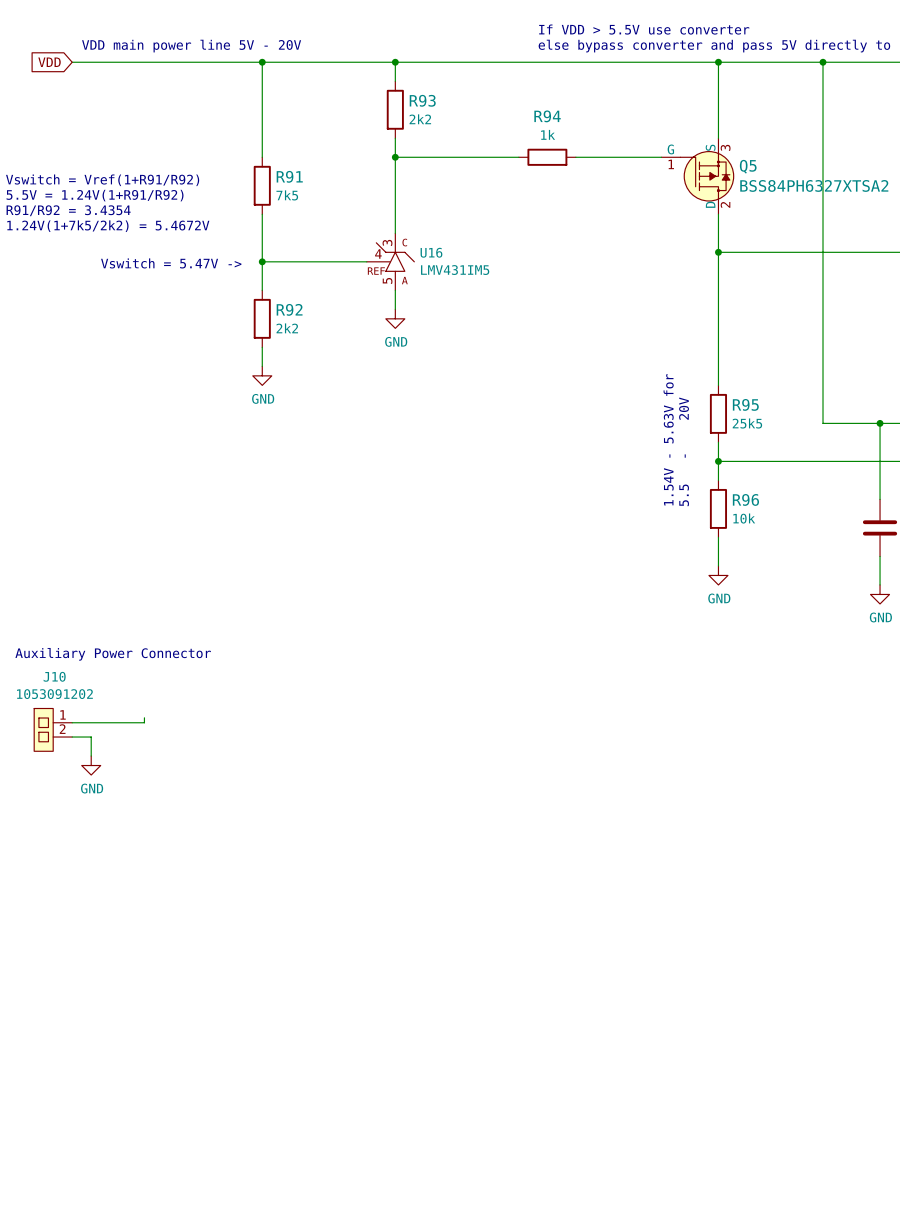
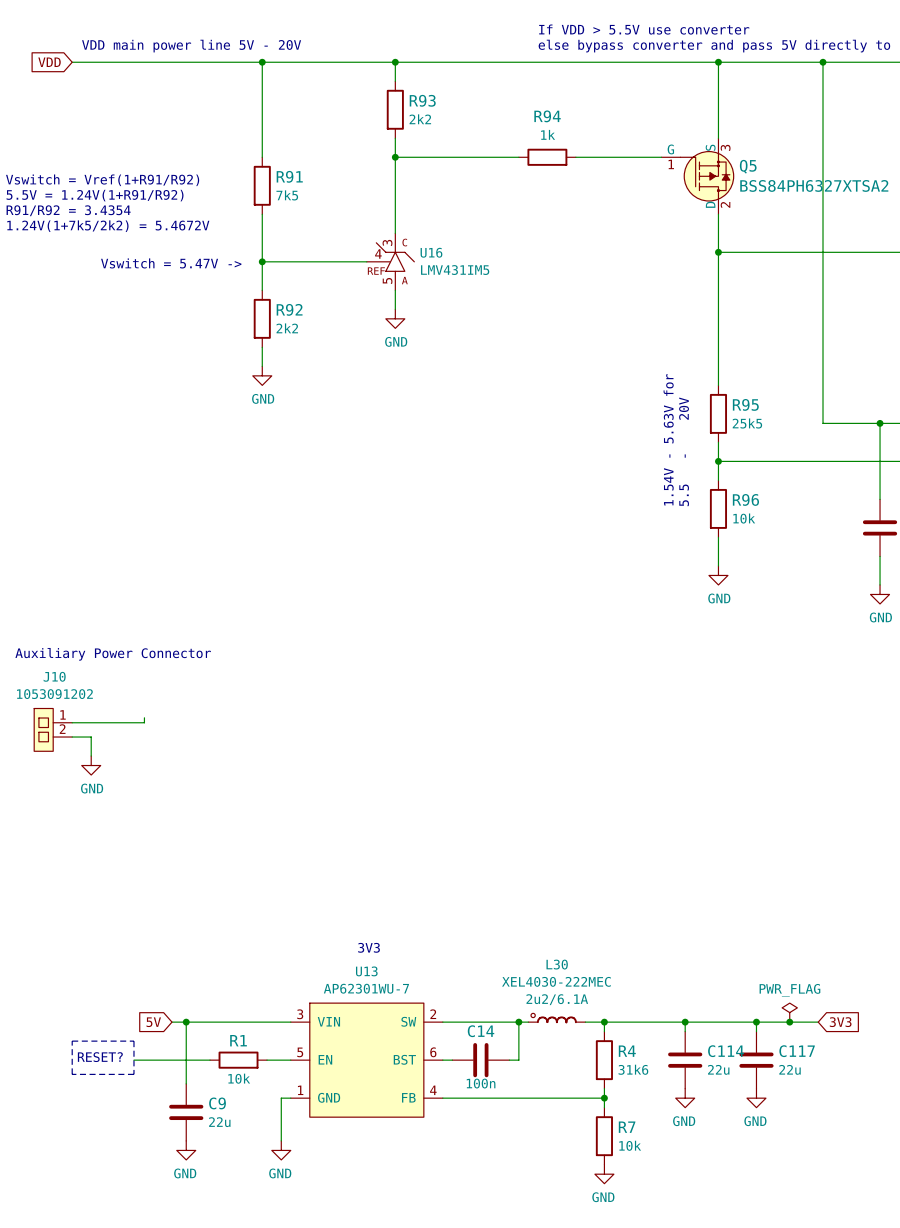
text: none -> 3V3 (369, 947)
power symbol: none -> PWR_FLAG (789, 1012)
L30: none -> XEL4030-222MEC (556, 1018)
global label: none -> 5V (153, 1022)
wire: none -> (171, 1022) (290, 1022)
wire: none -> (186, 1022) (186, 1083)
junction: none -> (186, 1022)
wire: none -> (442, 1022) (528, 1022)
wire: none -> (518, 1022) (518, 1060) (509, 1060)
junction: none -> (518, 1022)
wire: none -> (585, 1022) (818, 1022)
wire: none -> (604, 1022) (604, 1031)
junction: none -> (604, 1022)
wire: none -> (685, 1022) (685, 1031)
junction: none -> (685, 1022)
wire: none -> (756, 1022) (756, 1031)
junction: none -> (756, 1022)
junction: none -> (789, 1022)
global label: none -> 3V3 (840, 1022)
line: none -> (72, 1041) (72, 1074) (133, 1074) (133, 1041) (72, 1041)
text: none -> RESET? (100, 1057)
wire: none -> (133, 1060) (210, 1060)
R1: none -> (238, 1060)
wire: none -> (267, 1060) (290, 1060)
U13: none -> AP62301WU-7 (366, 1060)
wire: none -> (442, 1060) (452, 1060)
C14: none -> (480, 1060)
R4: none -> (604, 1060)
C114: none -> (685, 1060)
C117: none -> (756, 1060)
wire: none -> (604, 1088) (604, 1107)
wire: none -> (290, 1098) (281, 1098) (281, 1140)
wire: none -> (442, 1098) (604, 1098)
junction: none -> (604, 1098)
power symbol: none -> GND (685, 1098)
power symbol: none -> GND (756, 1098)
C9: none -> (186, 1112)
R7: none -> (604, 1136)
power symbol: none -> GND (186, 1150)
power symbol: none -> GND (281, 1150)
power symbol: none -> GND (604, 1174)

